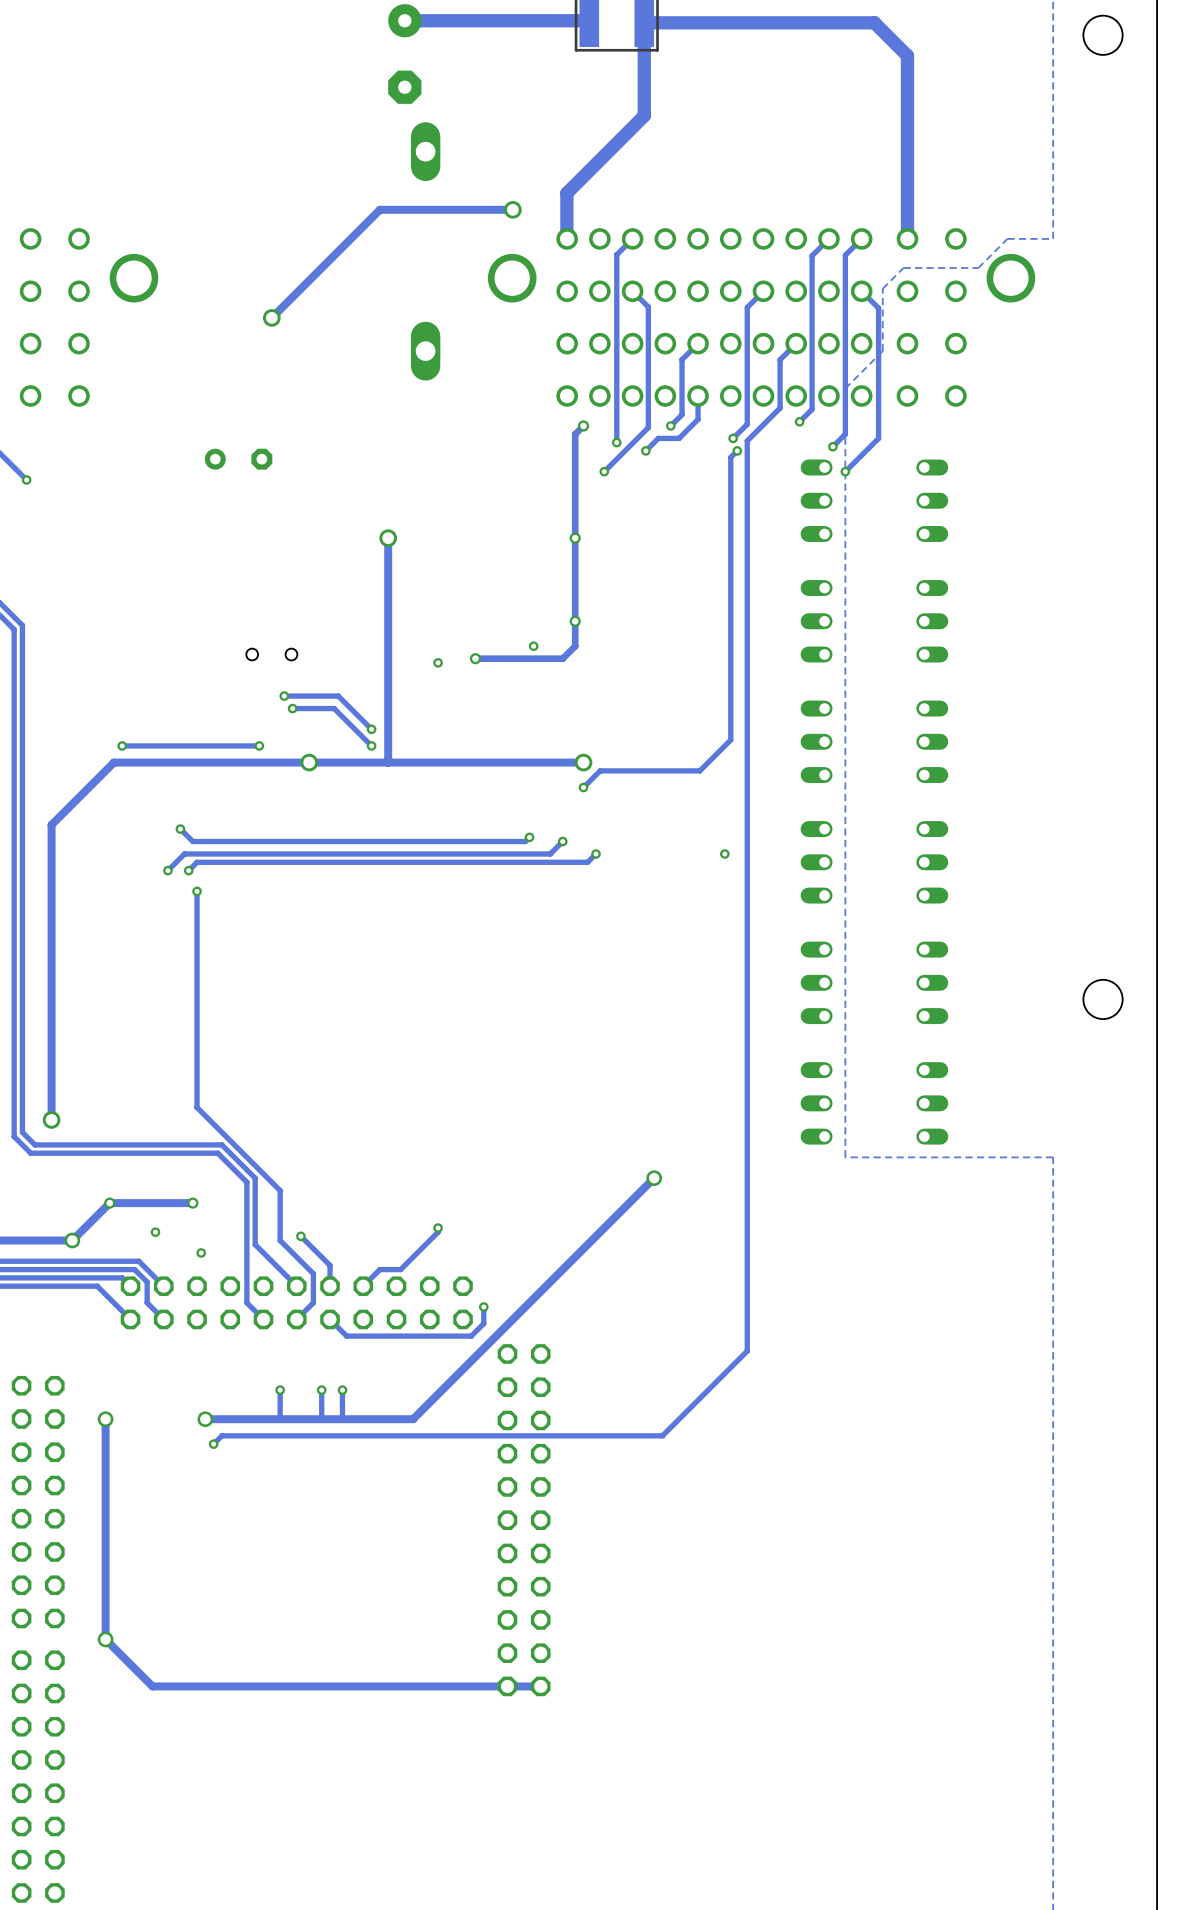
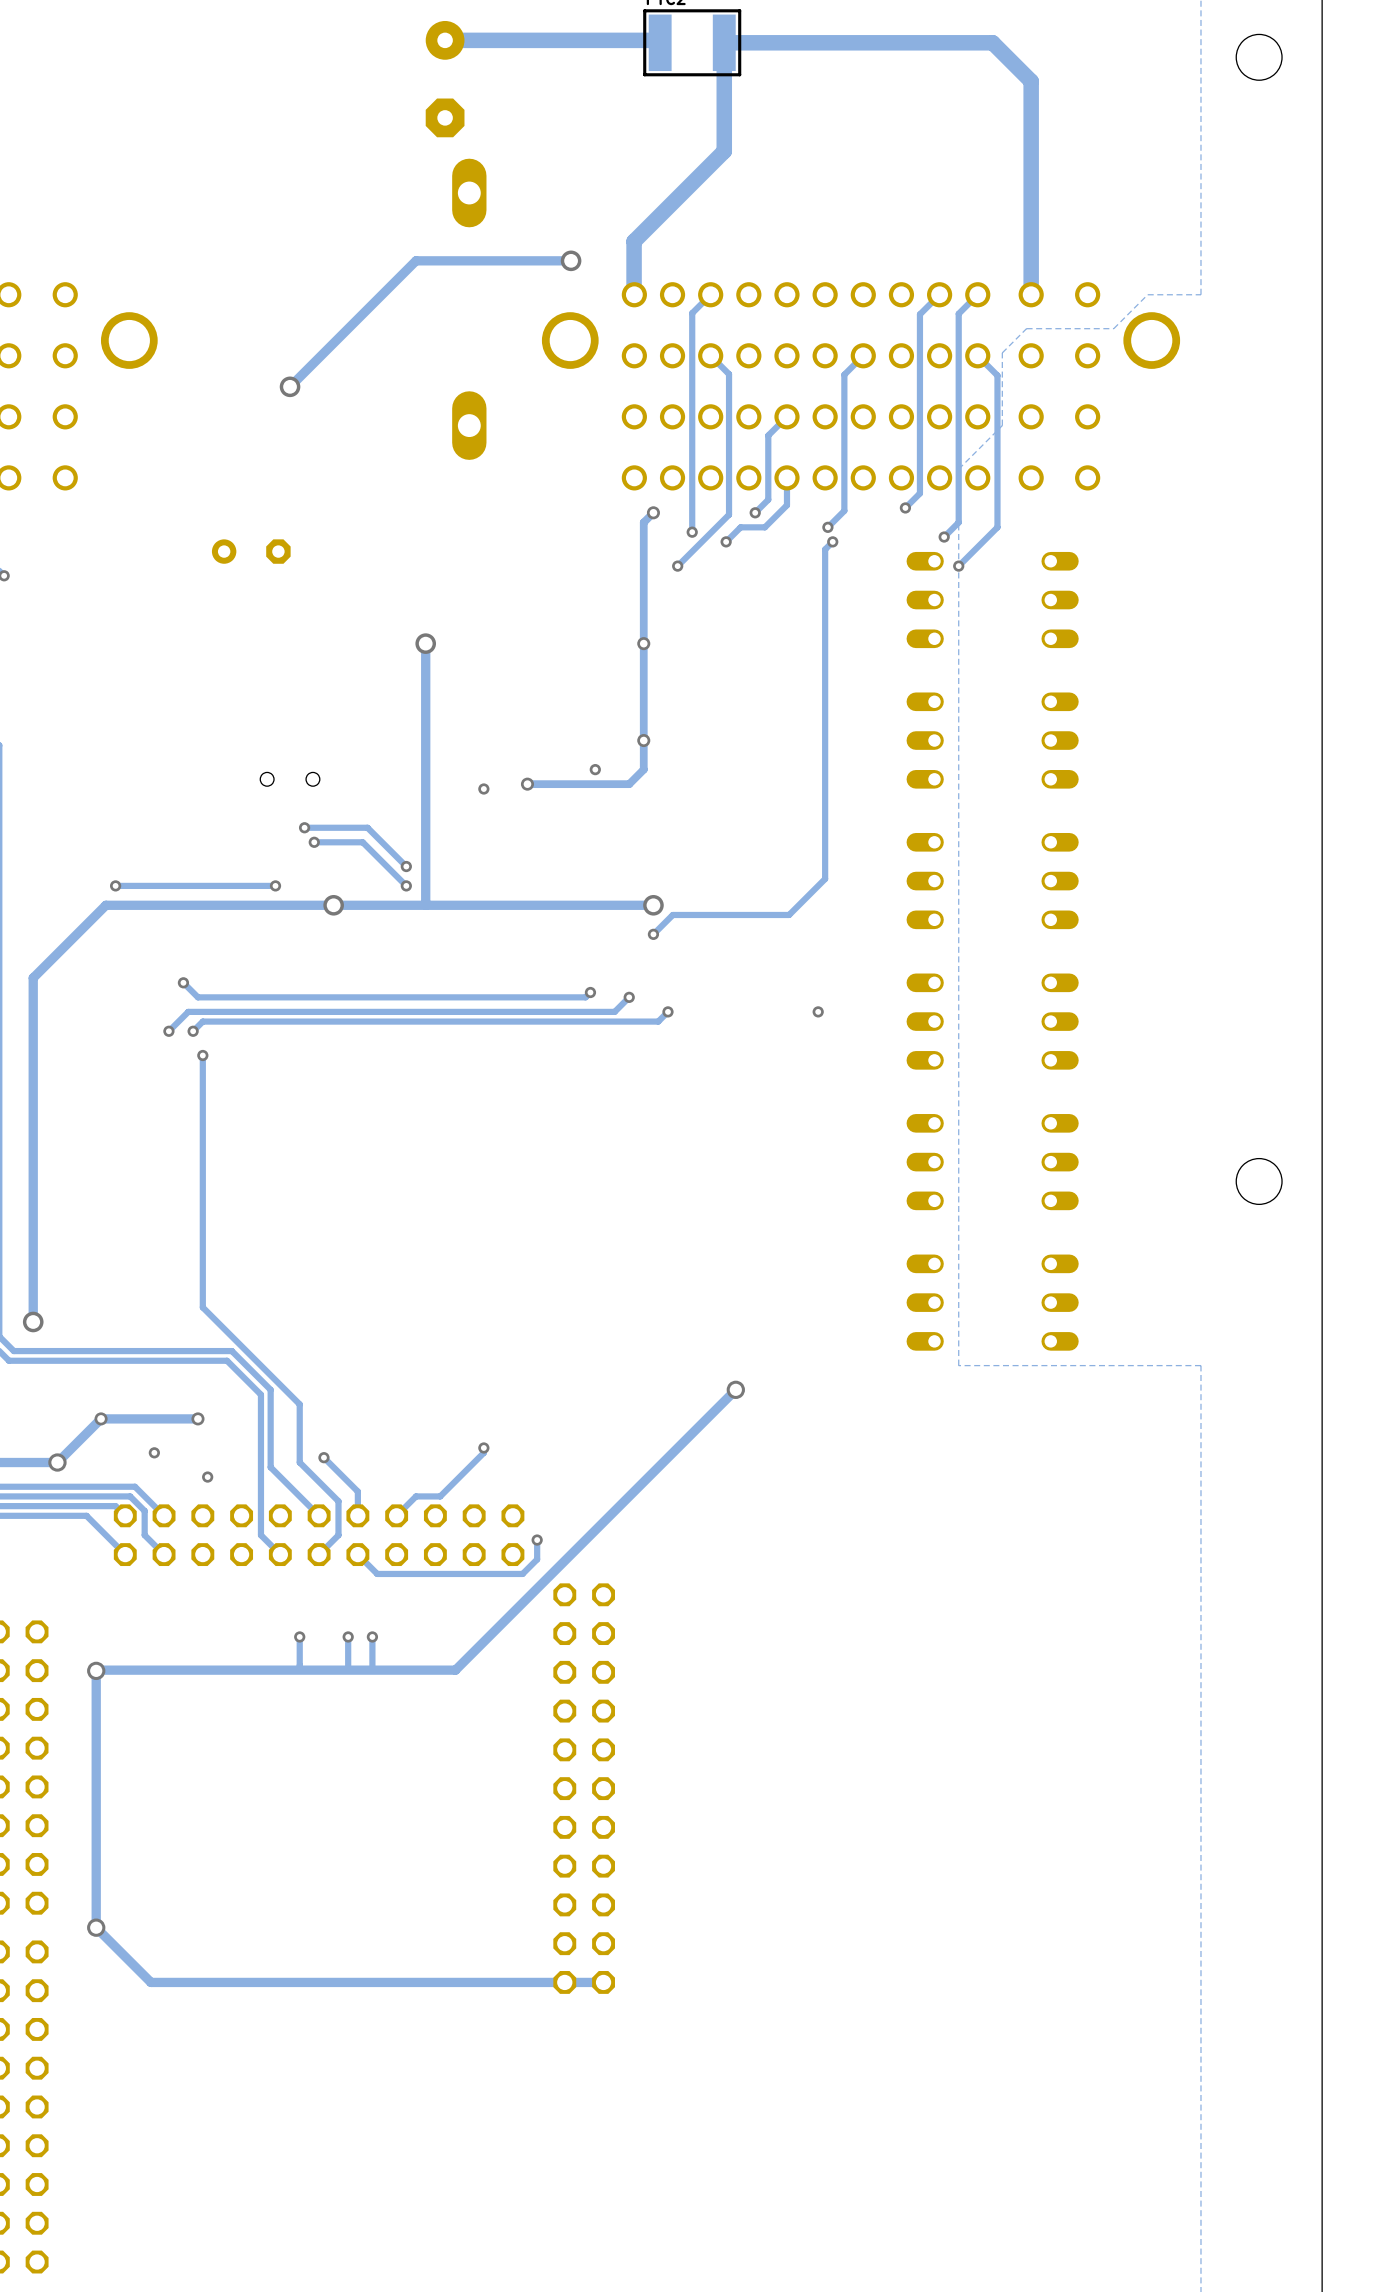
track: (796, 343) (780, 359) (780, 408) (747, 440) (747, 1351) (662, 1435) (221, 1435) (213, 1444) -> none
track: (413, 1418) (205, 1419) -> (455, 1670) (96, 1670)
via: (205, 1419) -> none
via: (213, 1444) -> none

